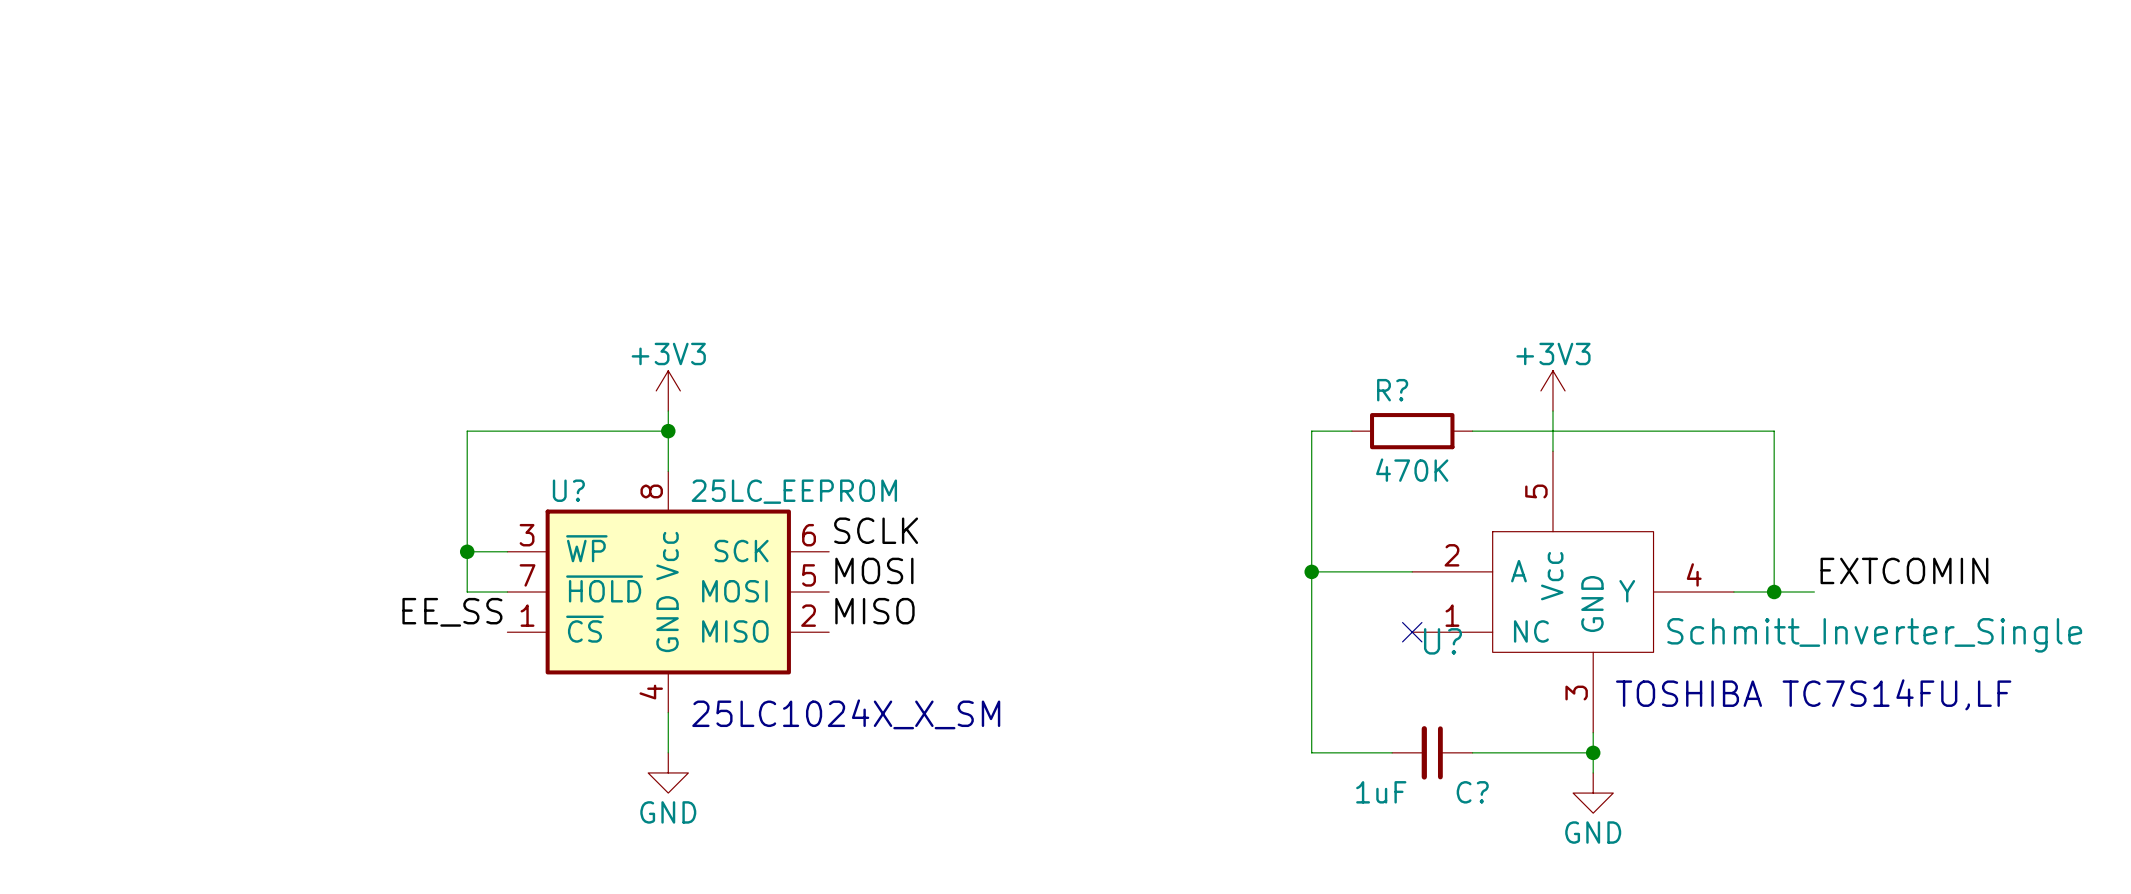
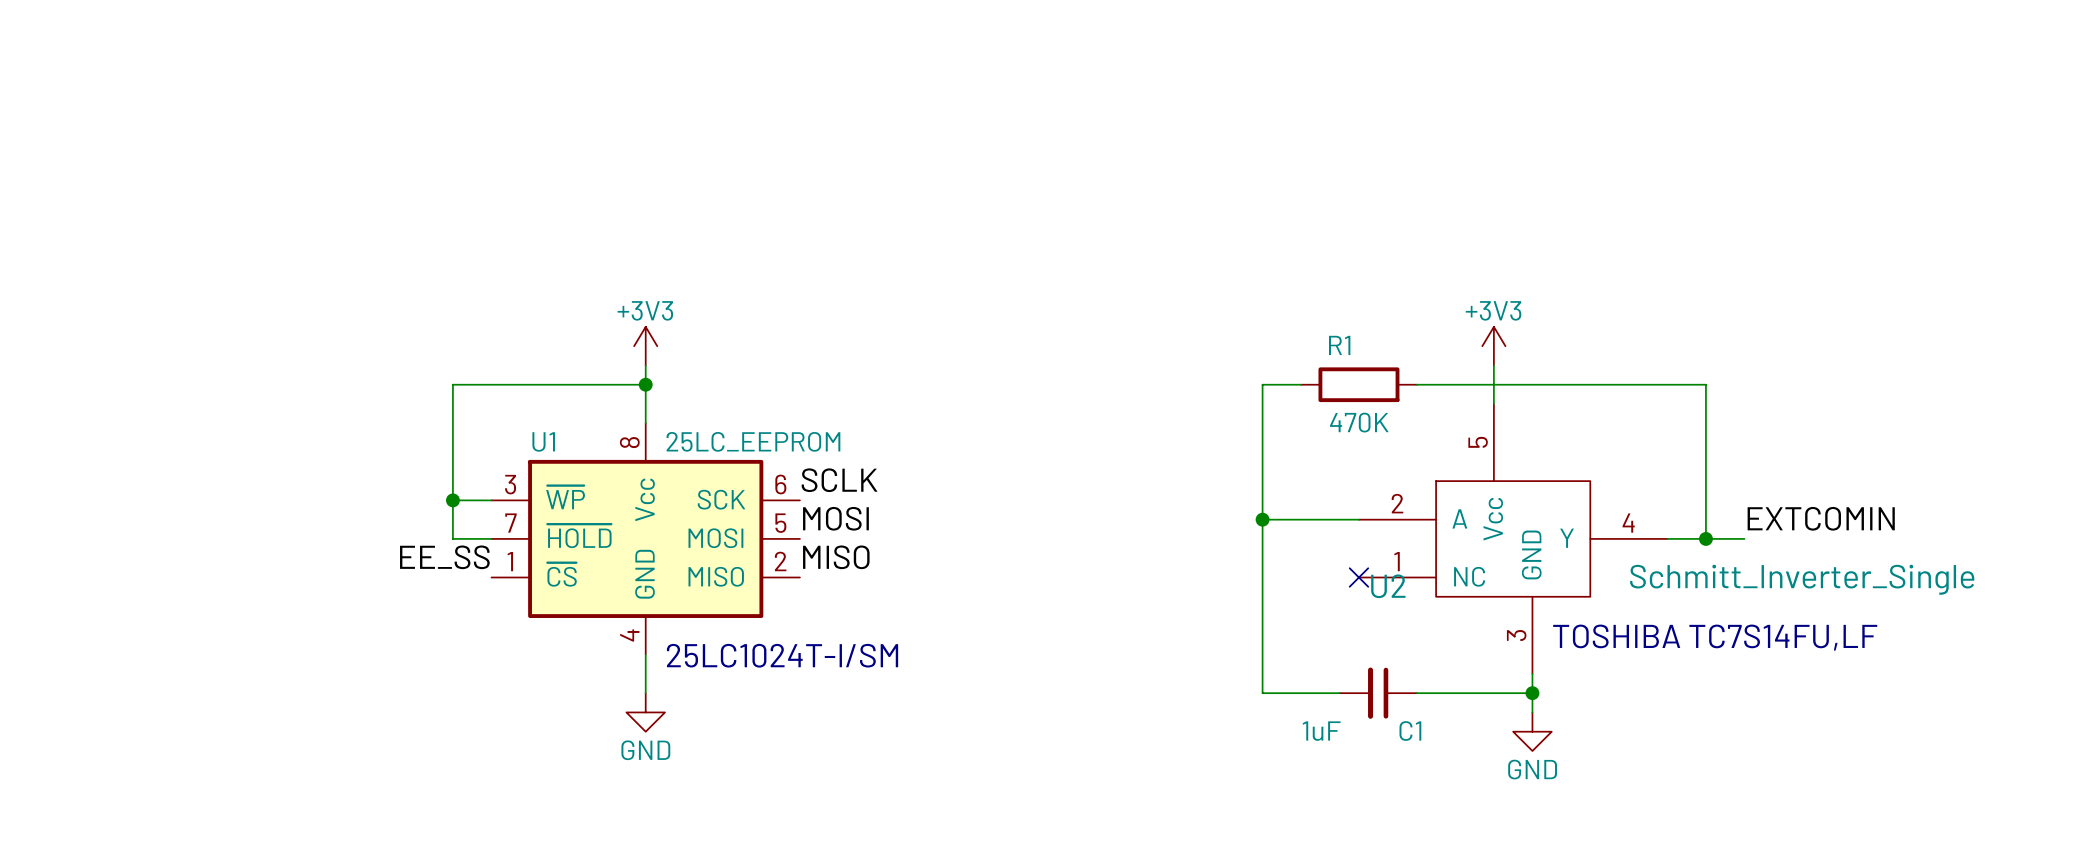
R? name: R? (1392, 390) -> R1 (1339, 345)
U? name: U? (568, 490) -> U1 (543, 441)
U? name: U? (1442, 641) -> U2 (1388, 586)
text: 25LC1024X_X_SM (846, 714) -> 25LC1024T-I/SM (782, 655)
C? name: C? (1472, 792) -> C1 (1410, 731)

